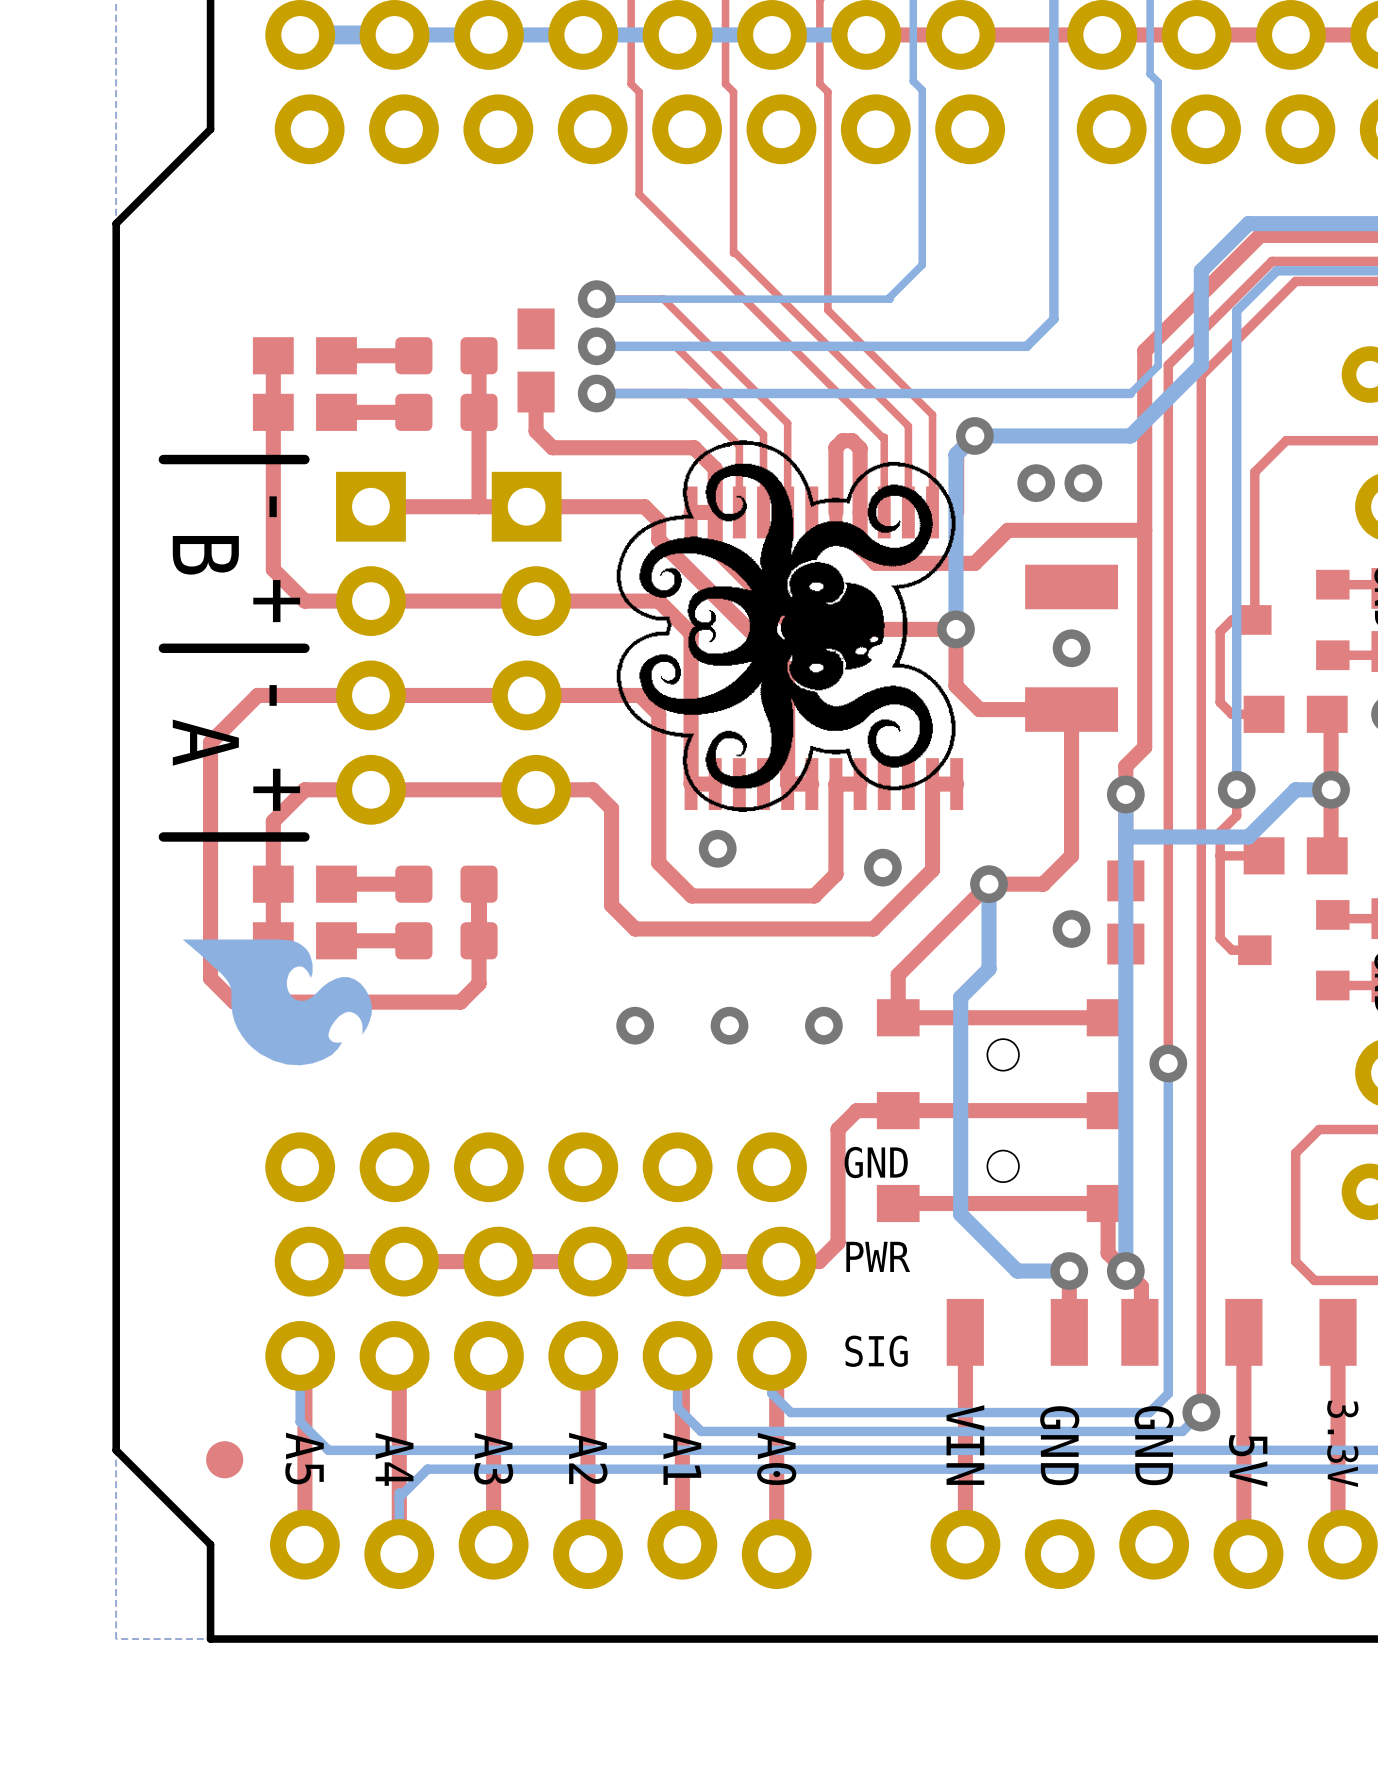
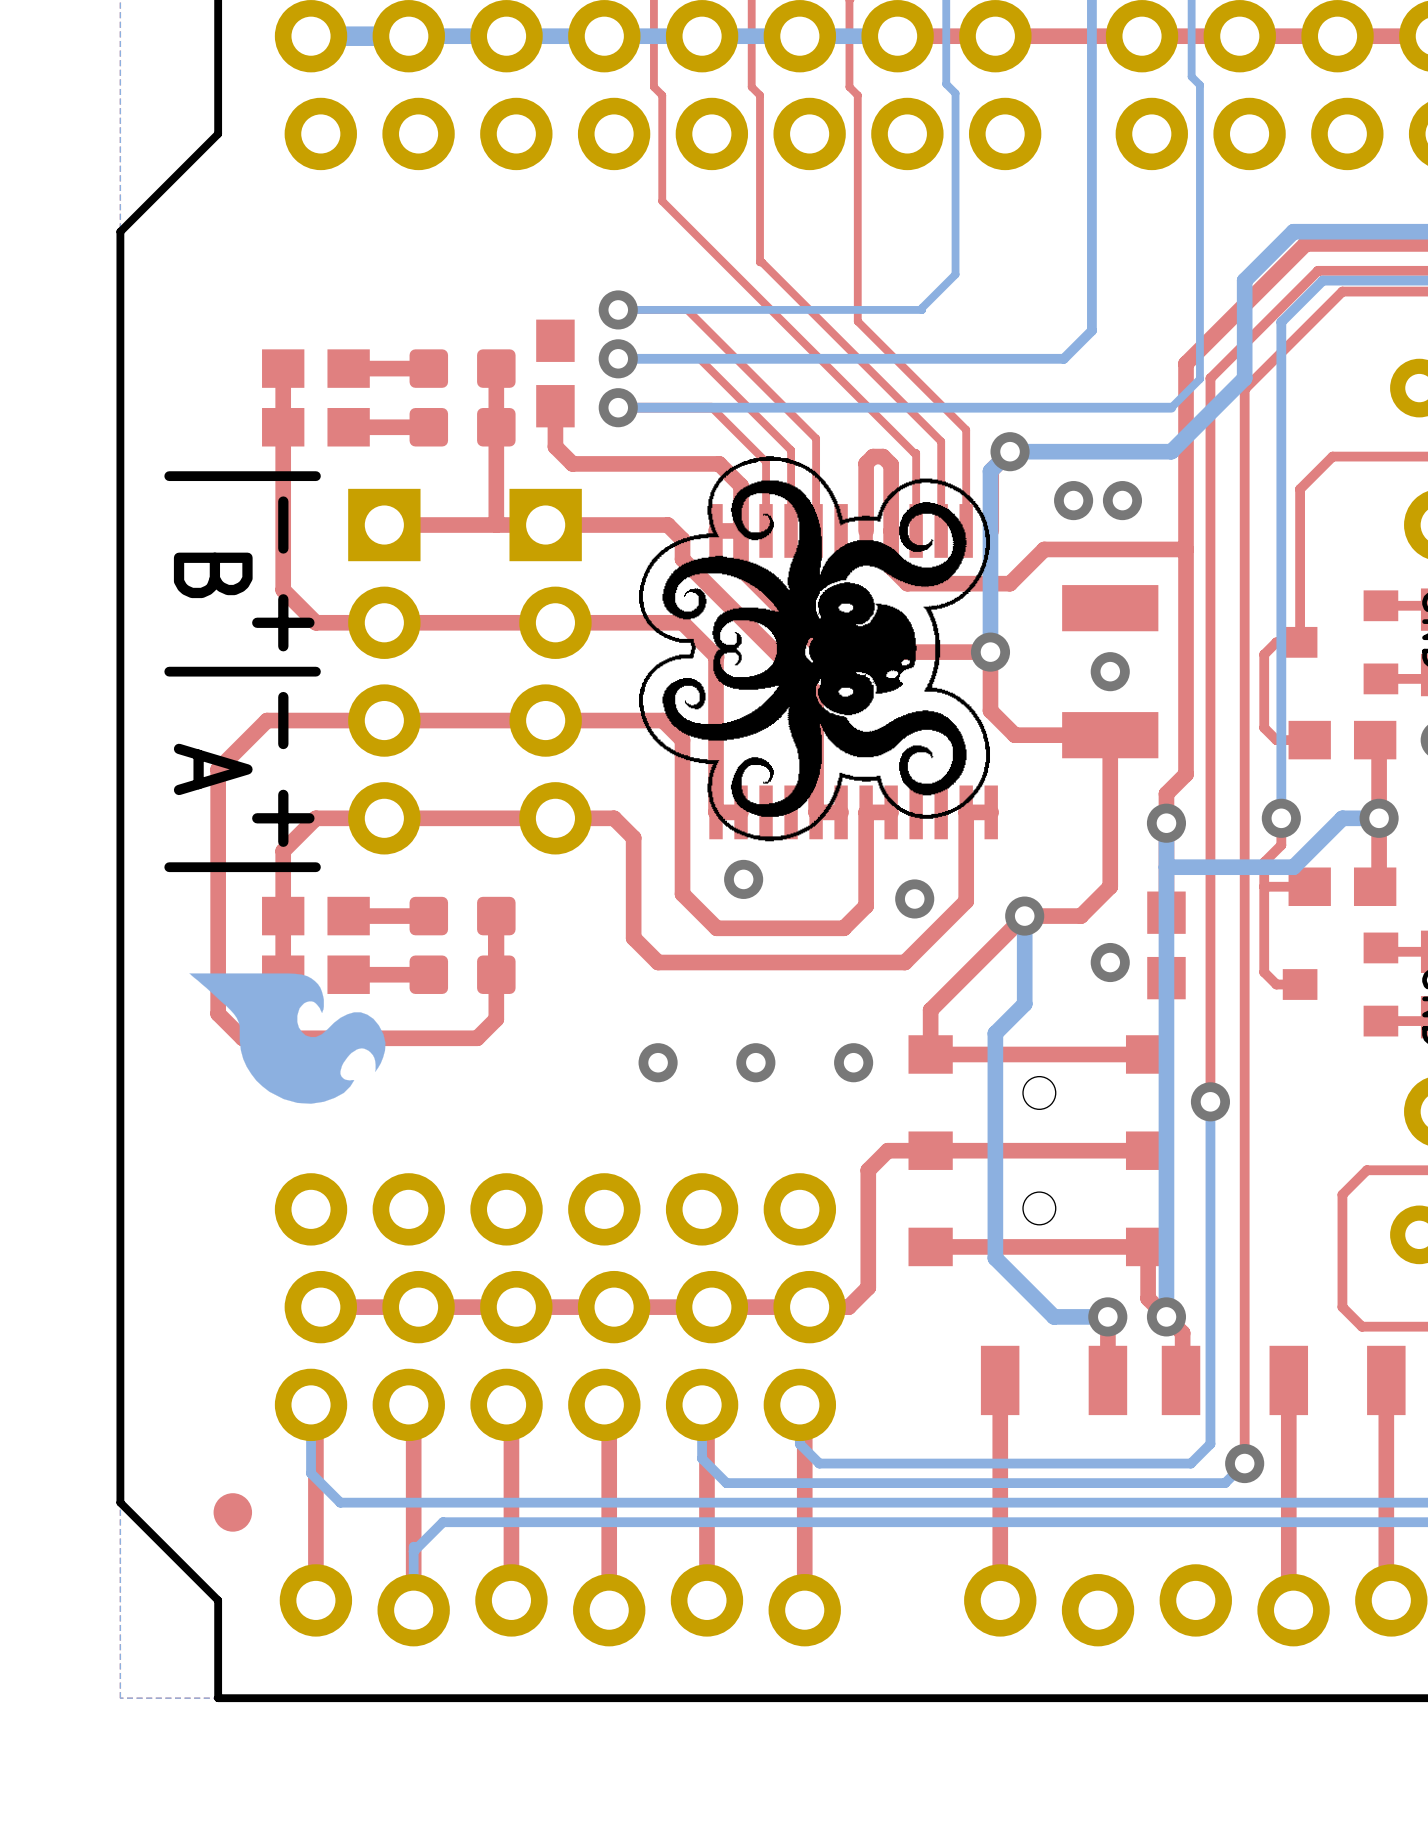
text: GND (876, 1162) -> none
text: PWR (878, 1256) -> none
text: SIG (876, 1351) -> none
text: 3.3V (1342, 1443) -> none
text: VIN (965, 1445) -> none
text: GND (1059, 1445) -> none
text: GND (1154, 1445) -> none
text: A5 (304, 1458) -> none
text: A3 (493, 1458) -> none
text: A2 (588, 1458) -> none
text: A1 (682, 1458) -> none
text: A0 (776, 1458) -> none
text: A4 (394, 1459) -> none
text: 5V (1248, 1460) -> none

